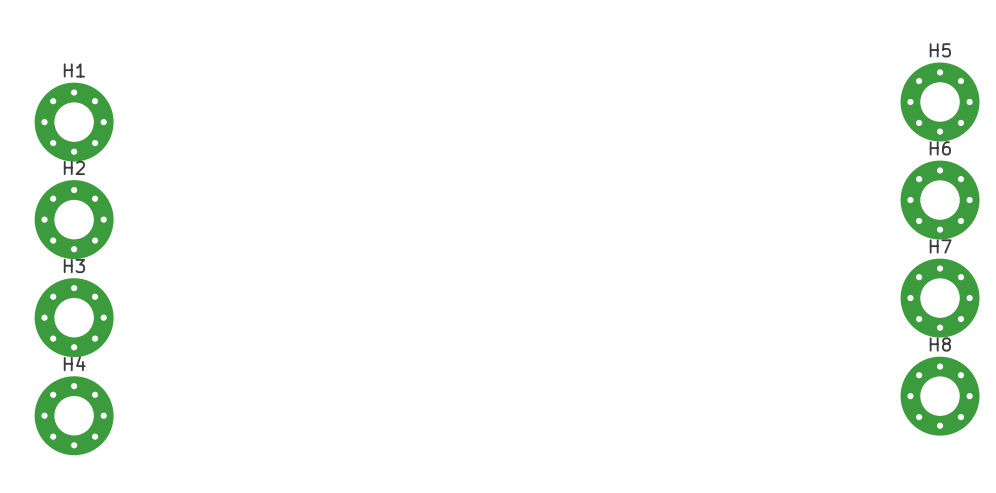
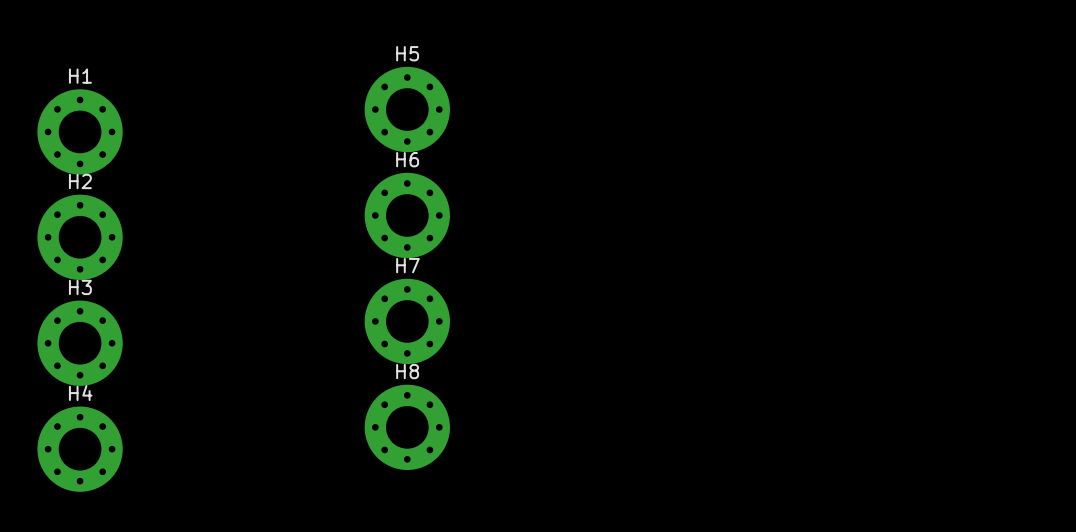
H5 position: (940, 101) -> (407, 109)
H6 position: (940, 200) -> (407, 215)
H7 position: (940, 298) -> (407, 321)
H8 position: (940, 396) -> (407, 427)

